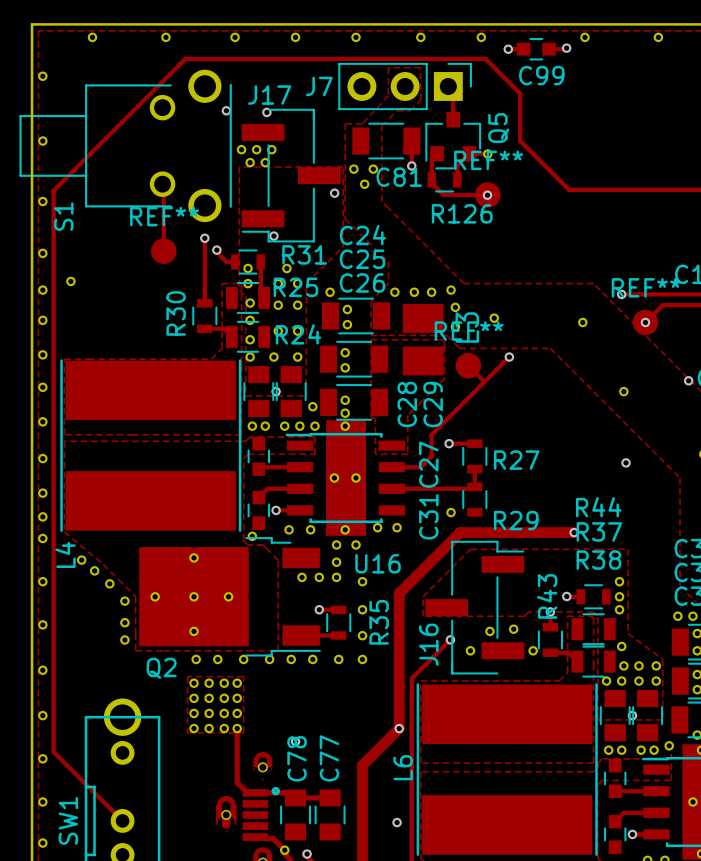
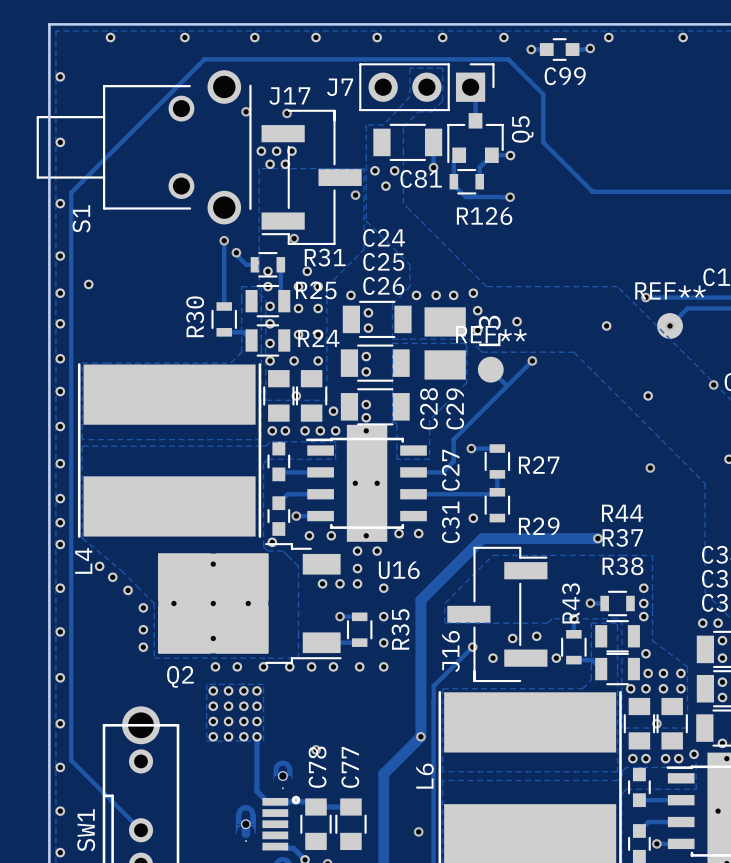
track: (162, 184) (163, 251) -> none
REF**: (487, 195) -> none
REF**: (163, 251) -> none

